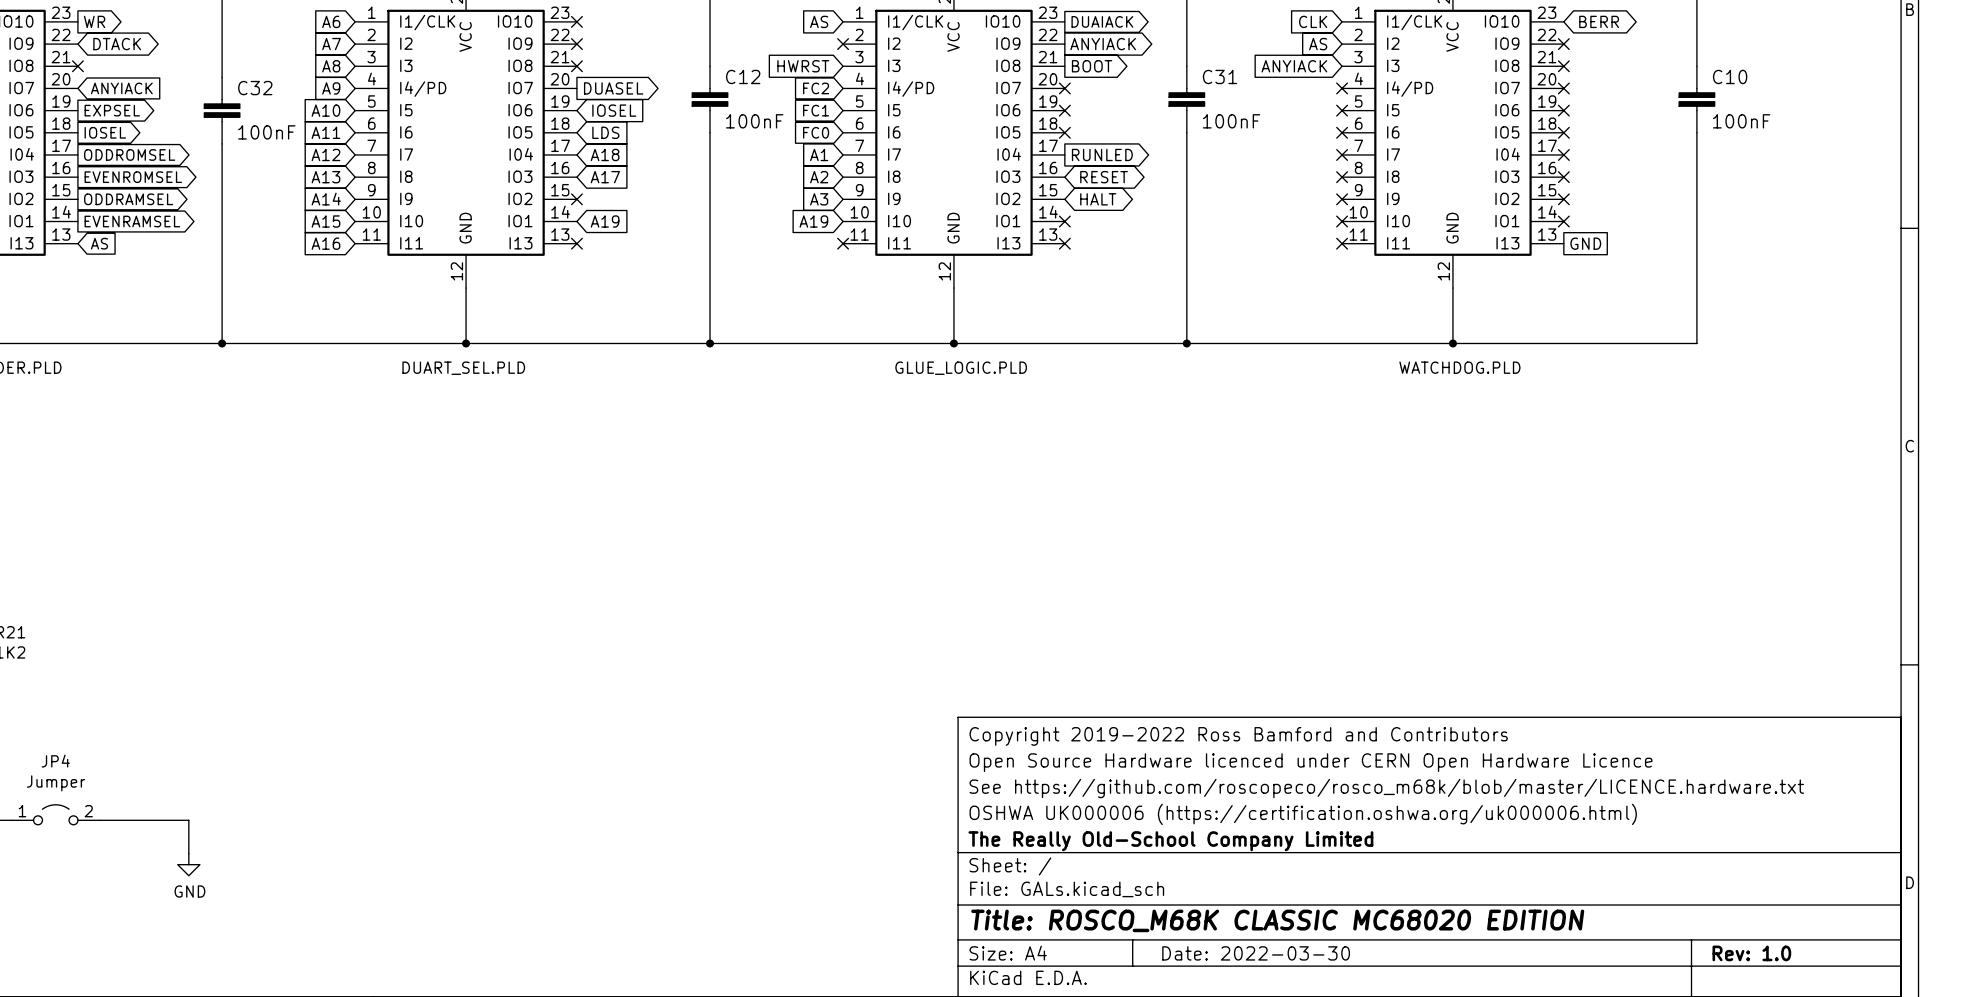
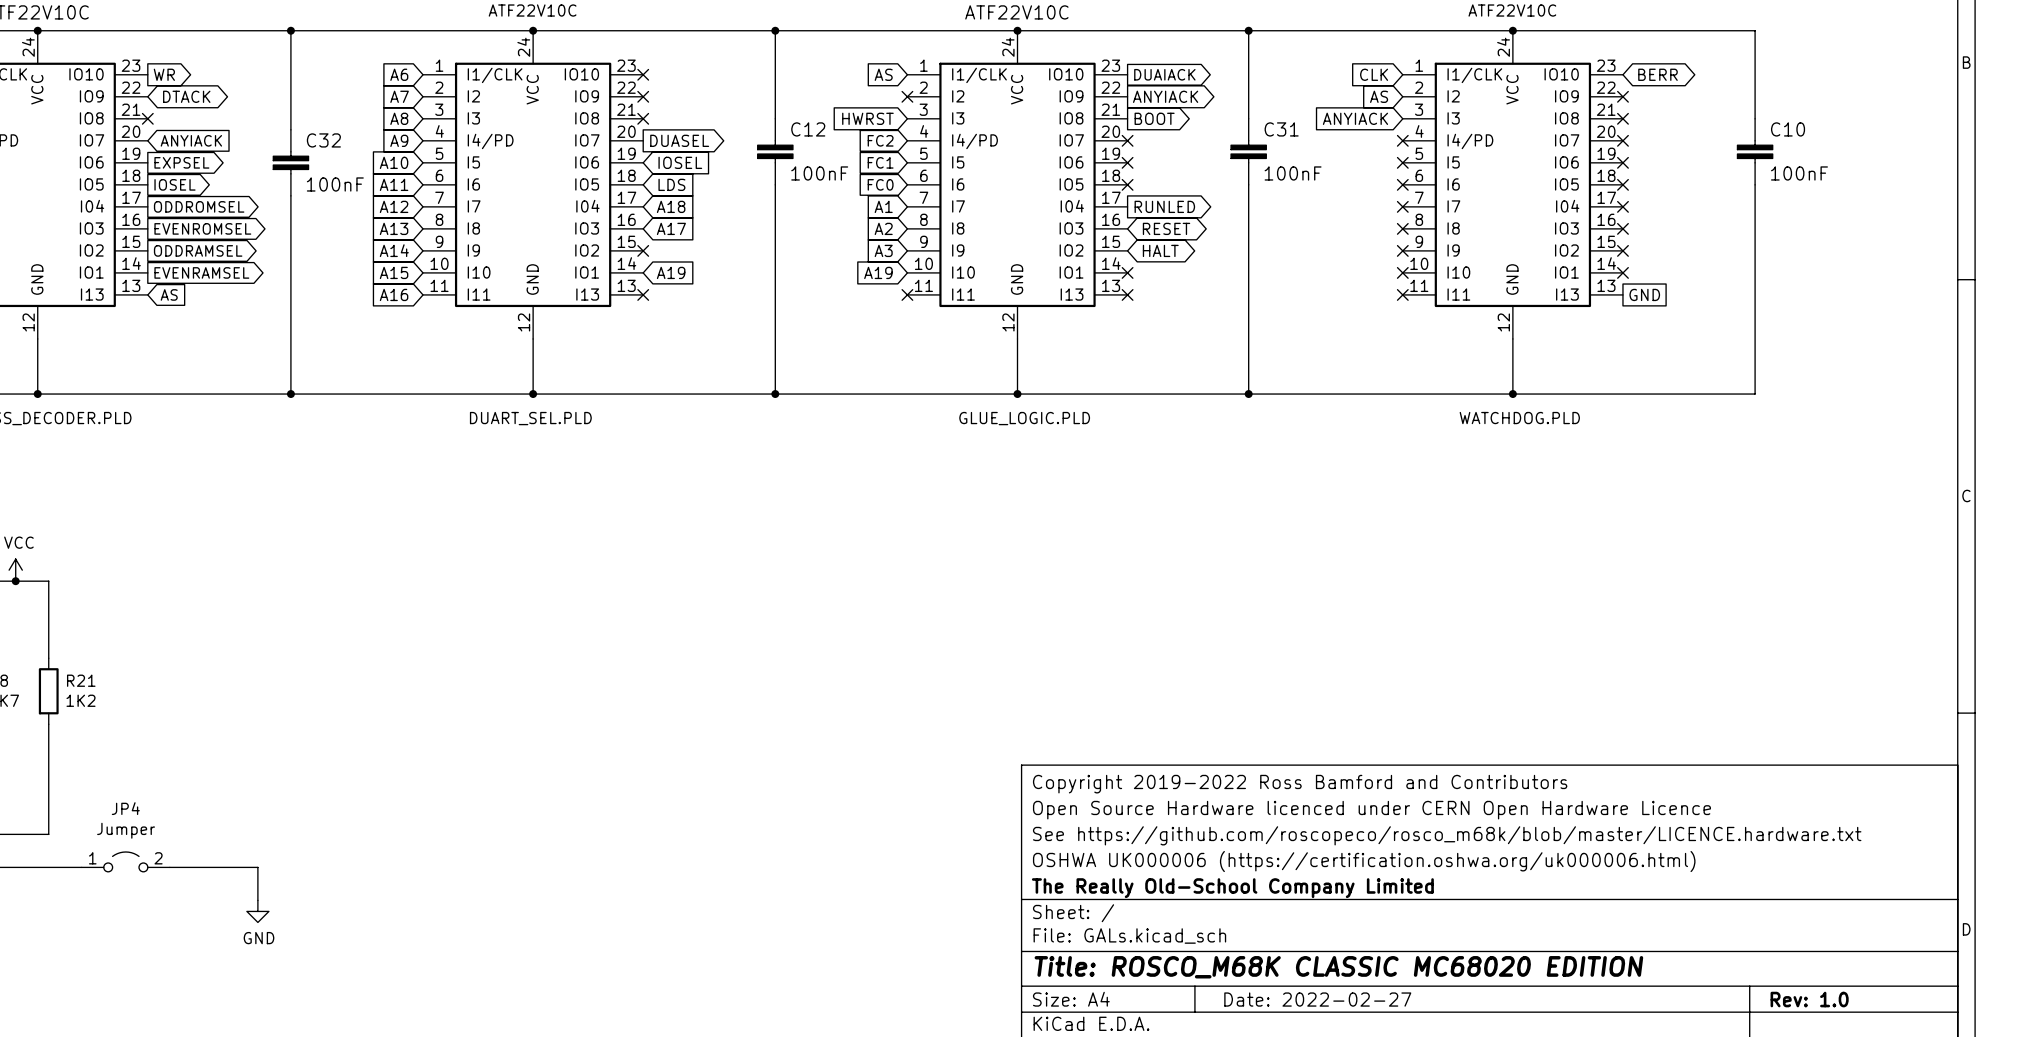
title block: Date: 2022-03-30 (1256, 953) -> Date: 2022-02-27 (1317, 999)

